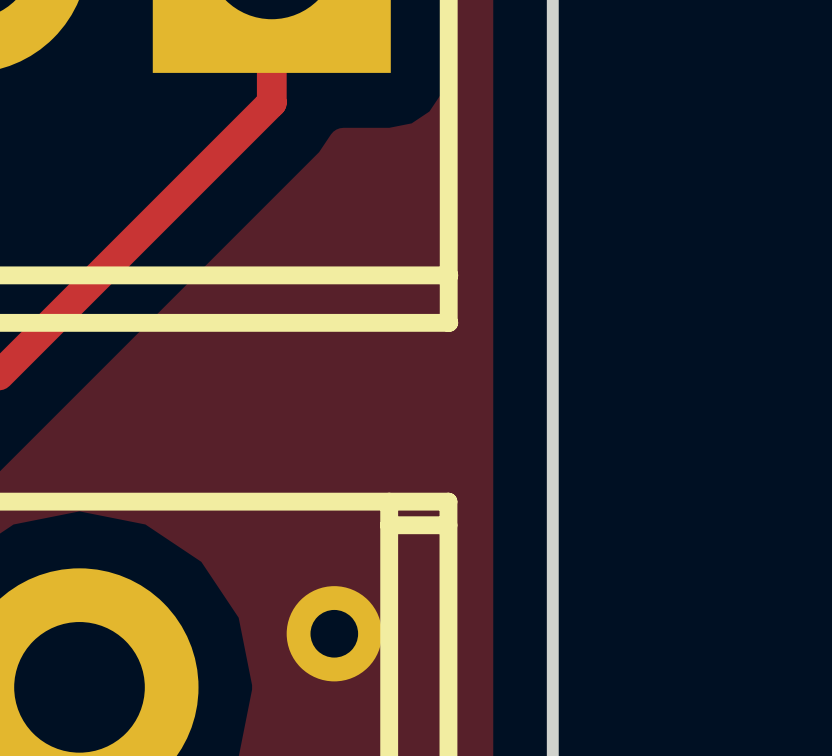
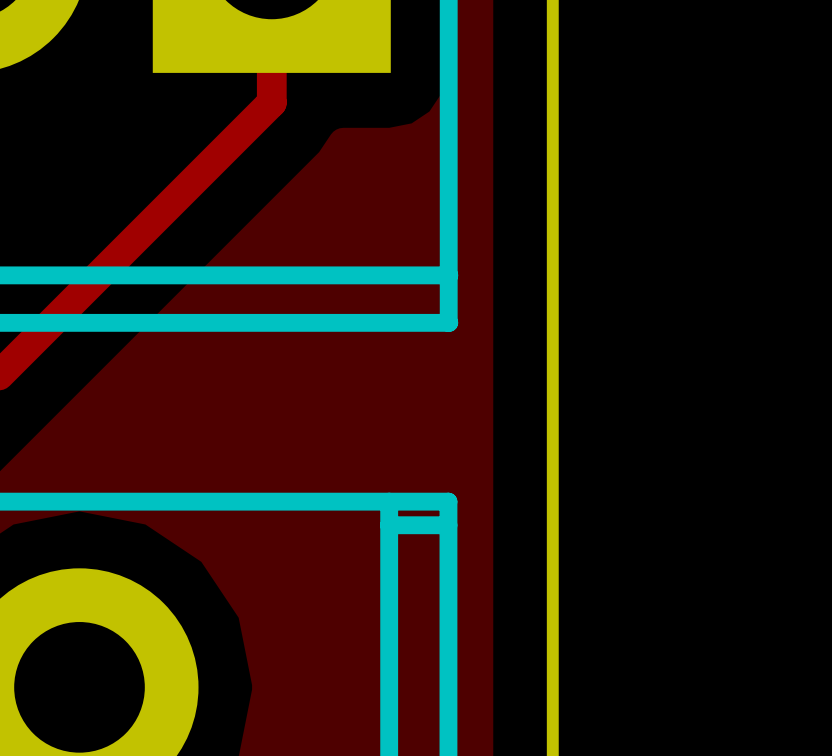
part: (334, 633) -> none

